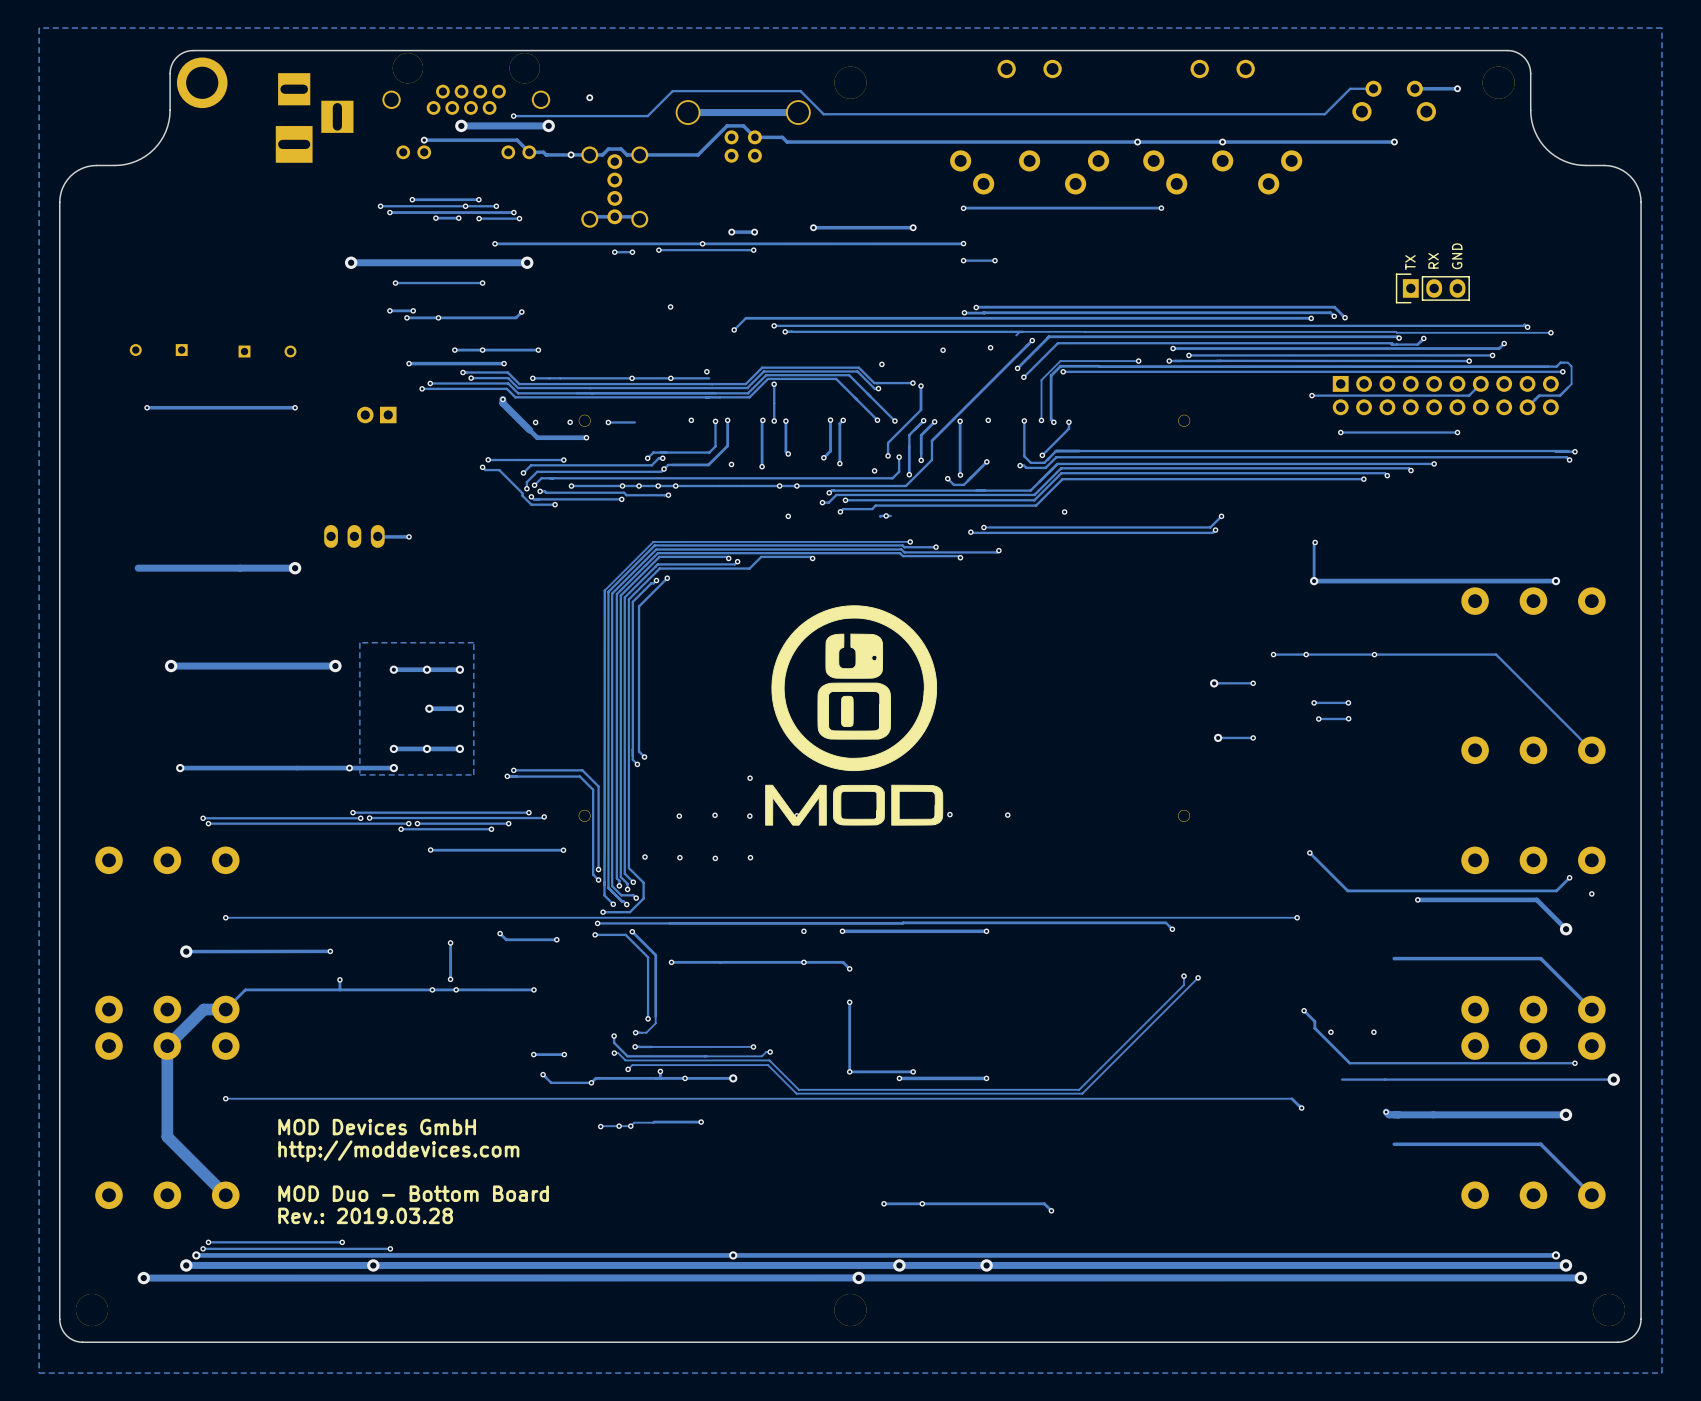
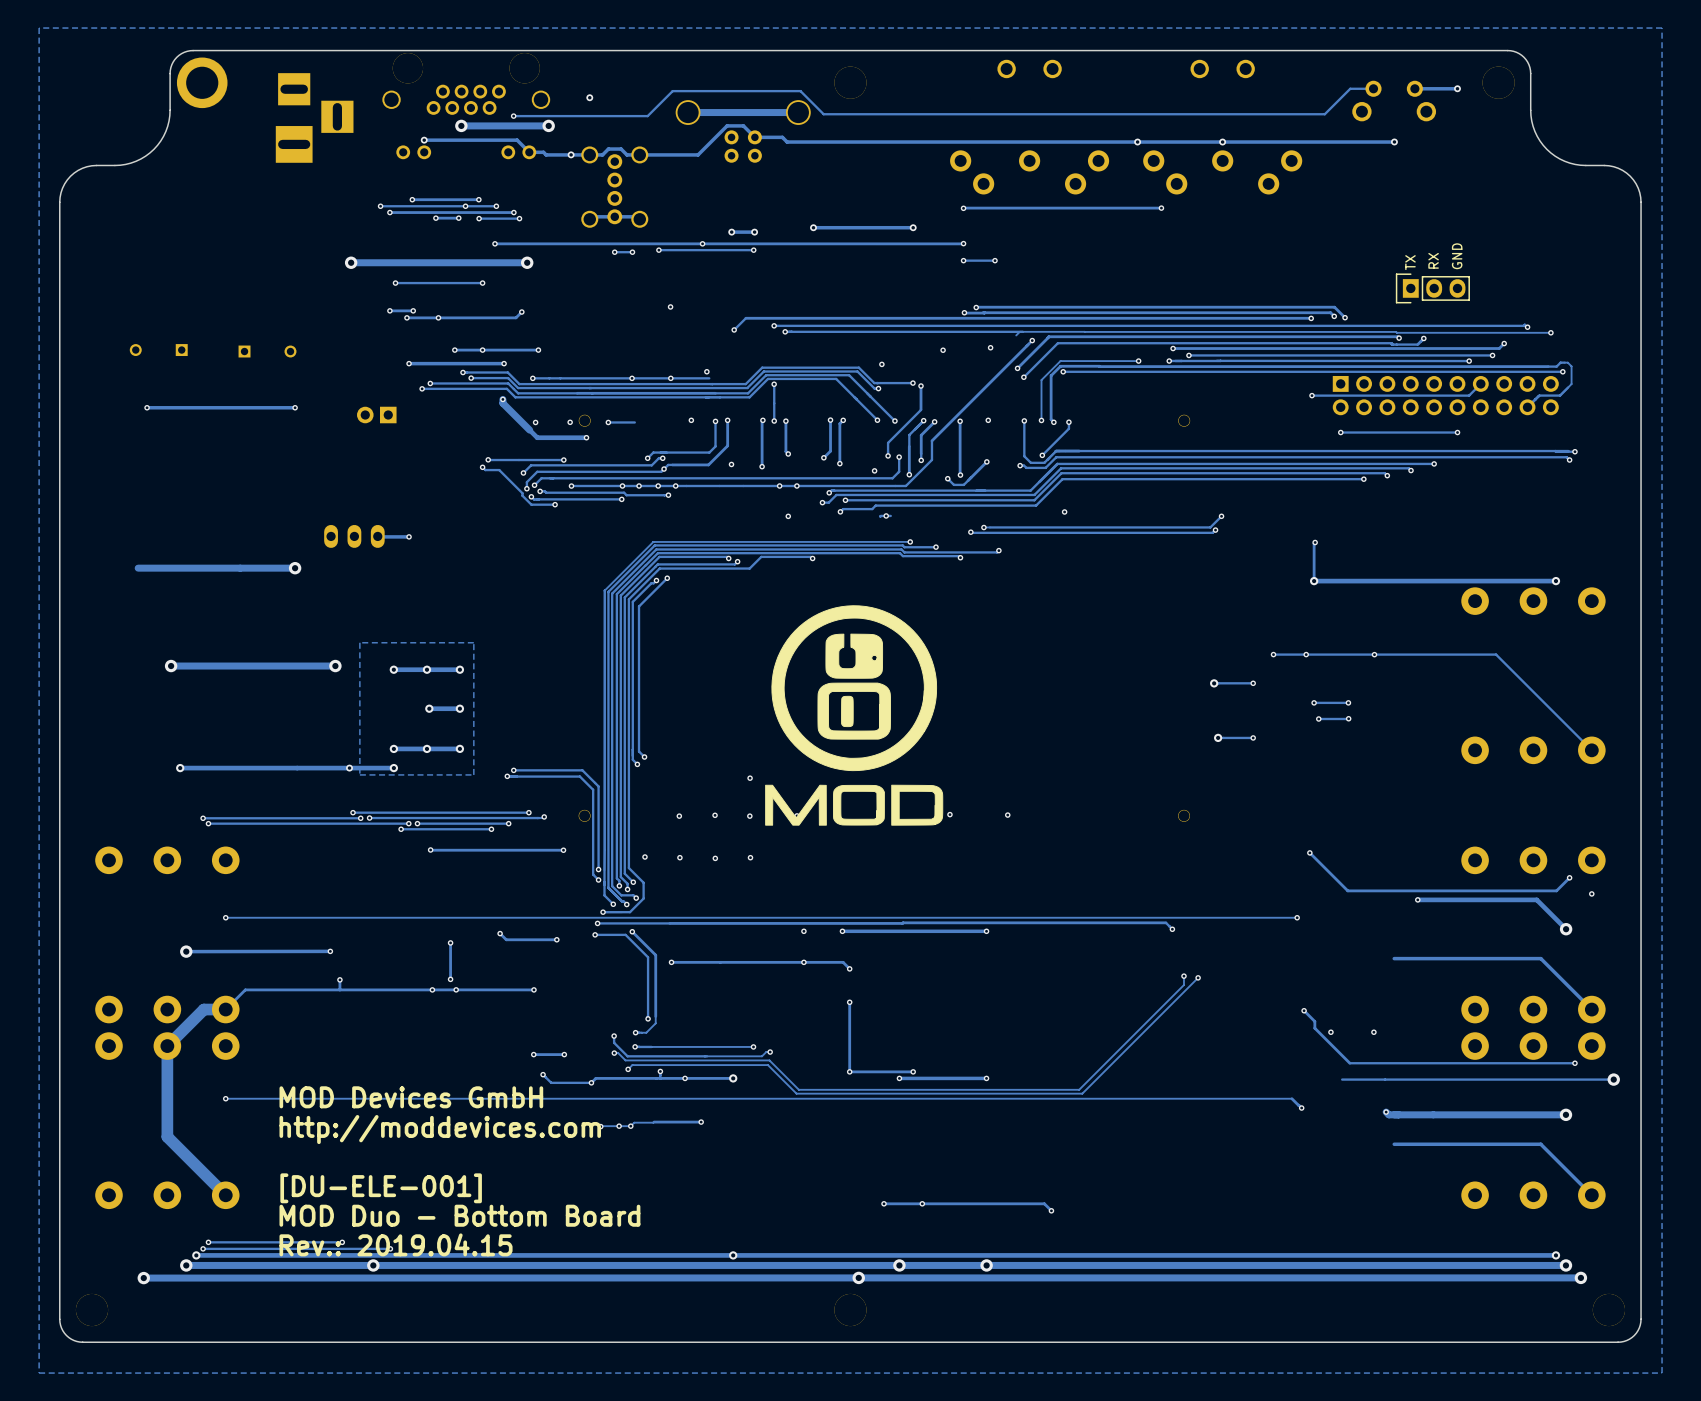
text: none -> MOD Devices GmbH (411, 1097)
text: MOD Devices GmbH (377, 1127) -> http://moddevices.com (440, 1129)
text: http://moddevices.com (398, 1151) -> none
text: MOD Duo - Bottom Board (413, 1193) -> [DU-ELE-001] (381, 1188)
text: Rev.: 2019.03.28 (365, 1215) -> MOD Duo - Bottom Board (459, 1215)
text: none -> Rev.: 2019.04.15 (396, 1244)

